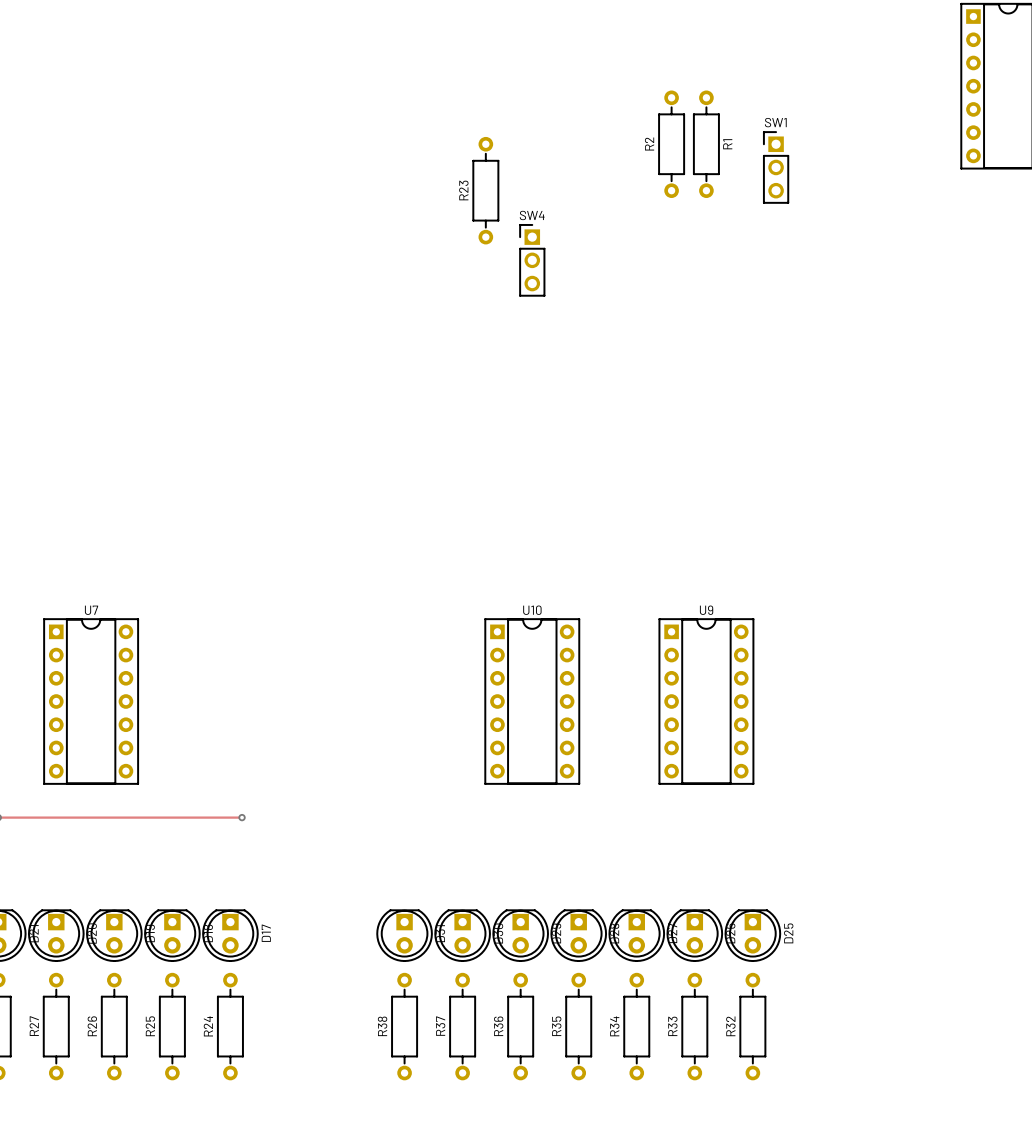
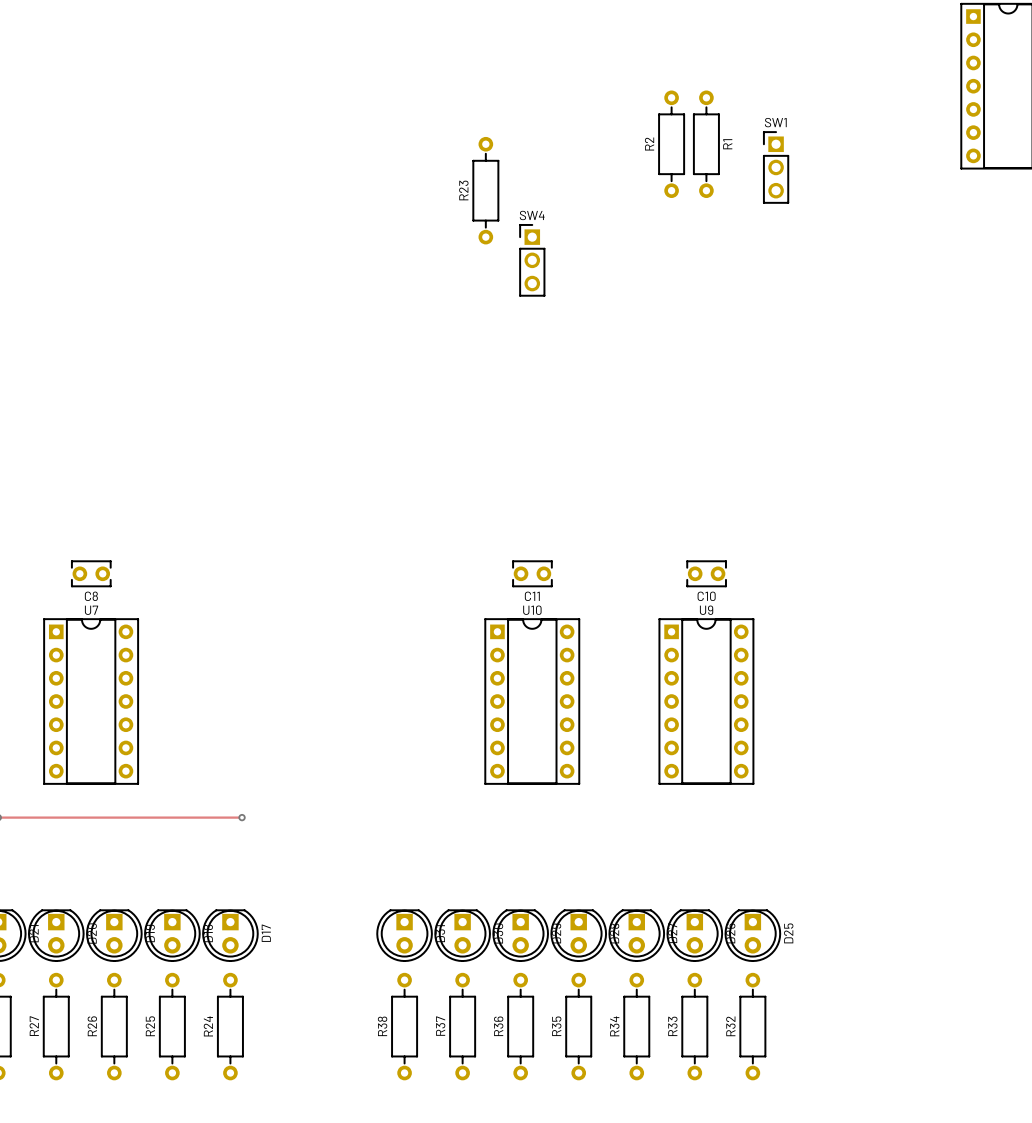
C8: none -> (91, 573)
C11: none -> (532, 573)
C10: none -> (706, 573)

